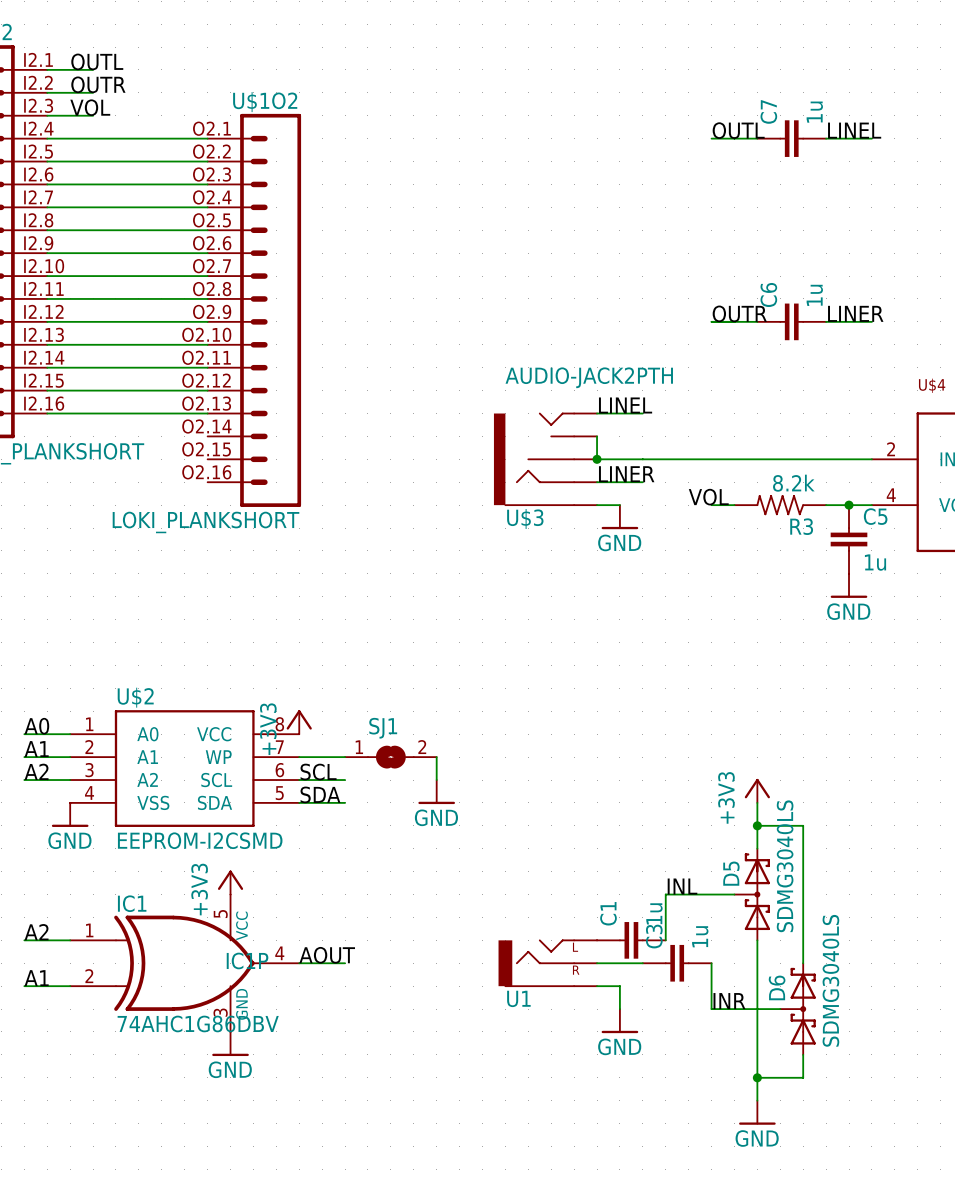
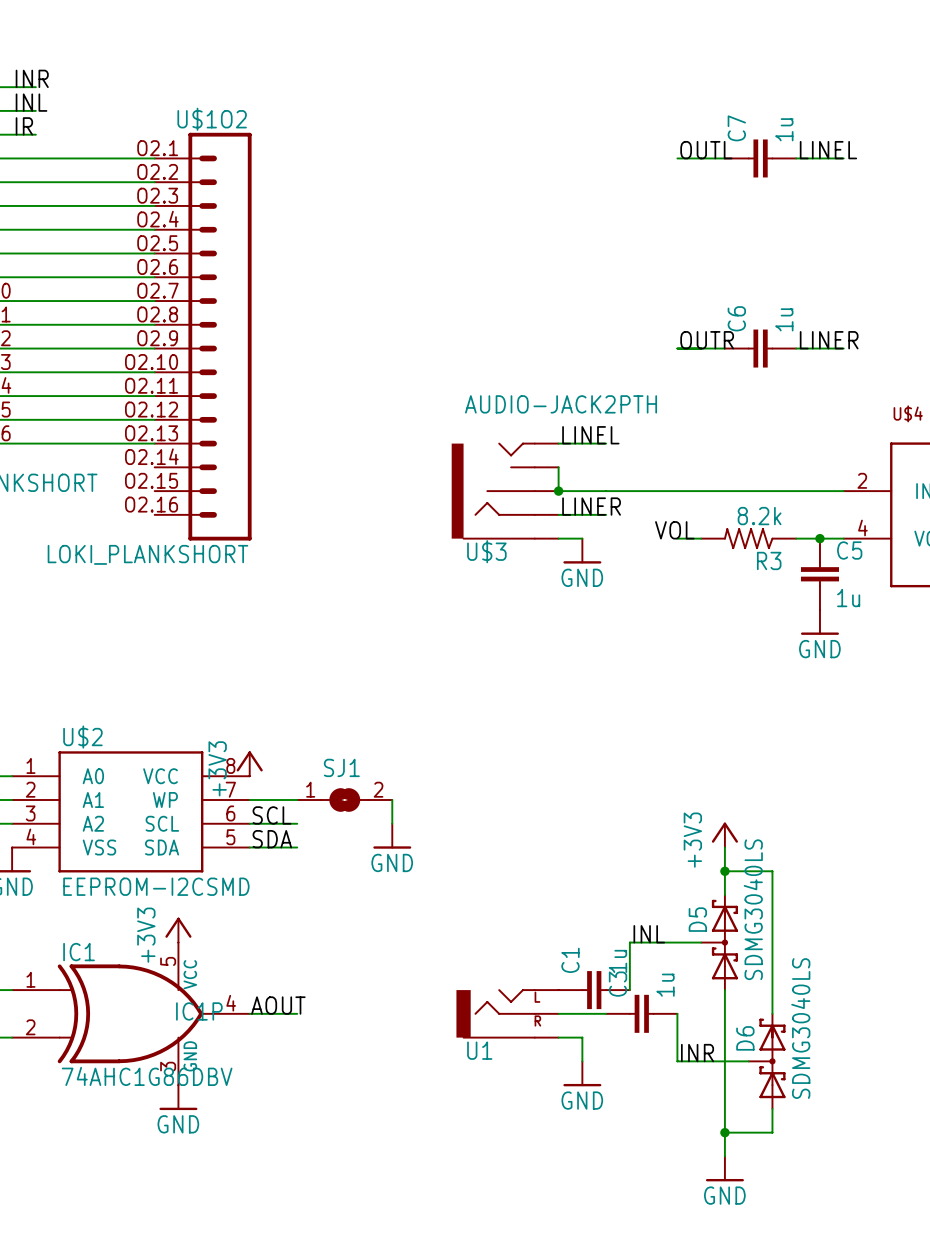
label: OUTL (97, 61) -> INR (32, 78)
label: OUTR (98, 84) -> INL (31, 102)
label: VOL (90, 107) -> IR (24, 126)

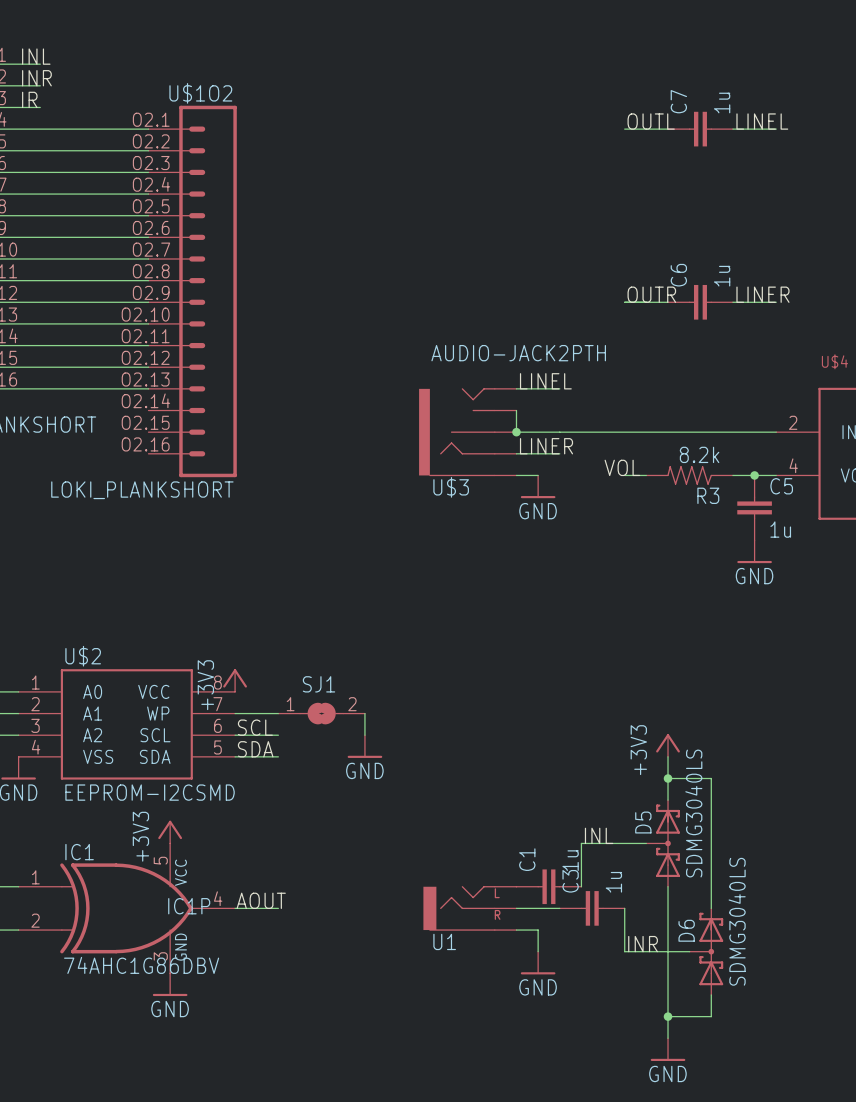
label: INR (32, 78) -> INL (36, 56)
label: INL (31, 102) -> INR (36, 78)

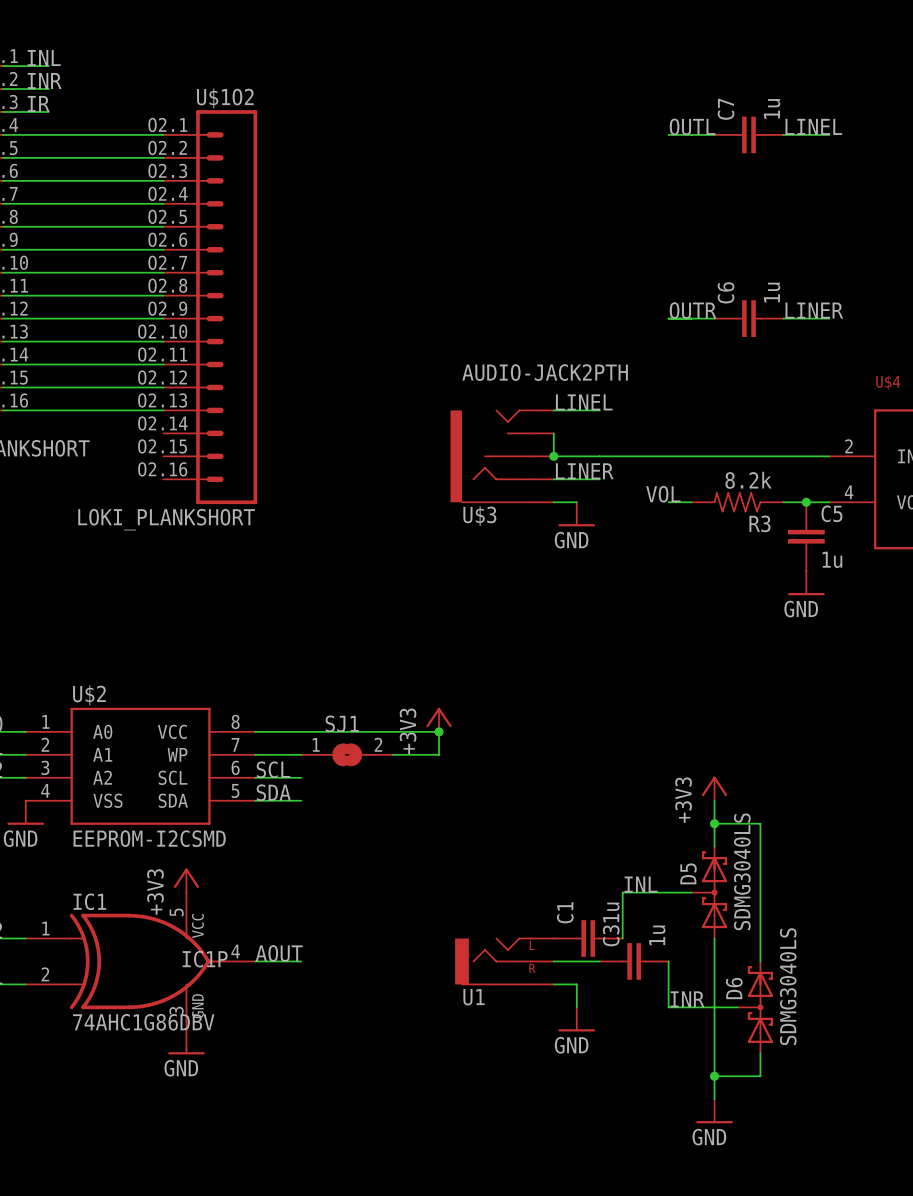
power symbol position: +3V3 (235, 680) -> +3V3 (439, 719)
junction: none -> (439, 731)
wire: (364, 713) (364, 735) -> (393, 754) (439, 754) (439, 731) (255, 731)
power symbol: GND (364, 746) -> none

